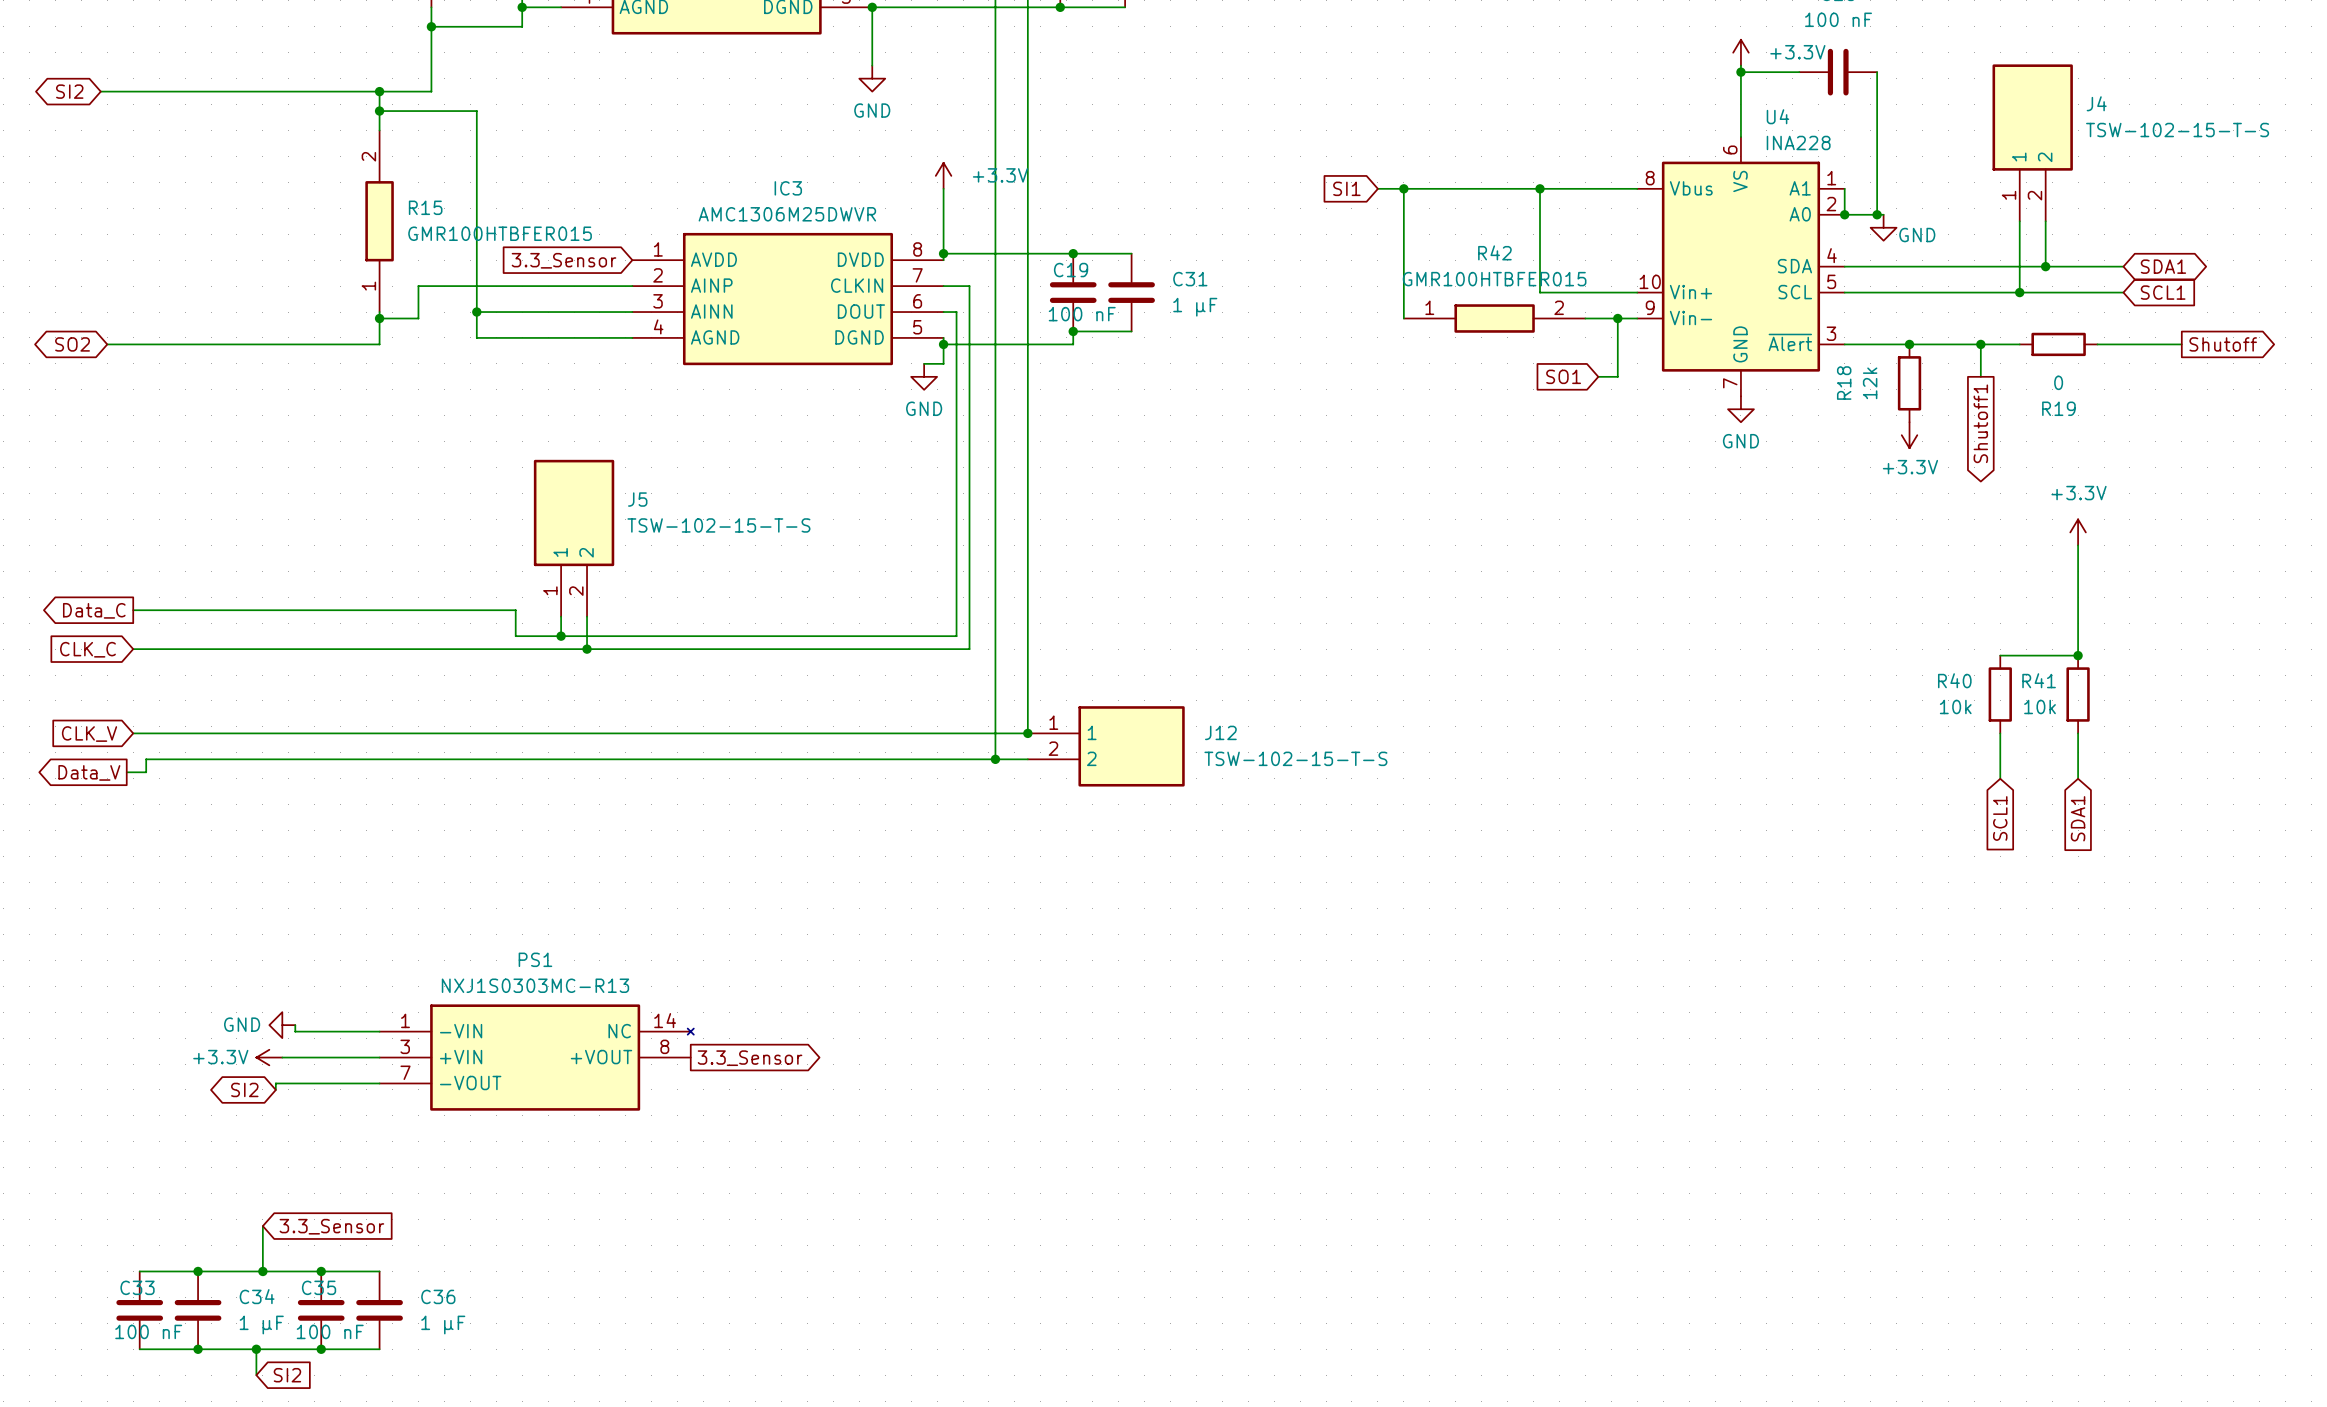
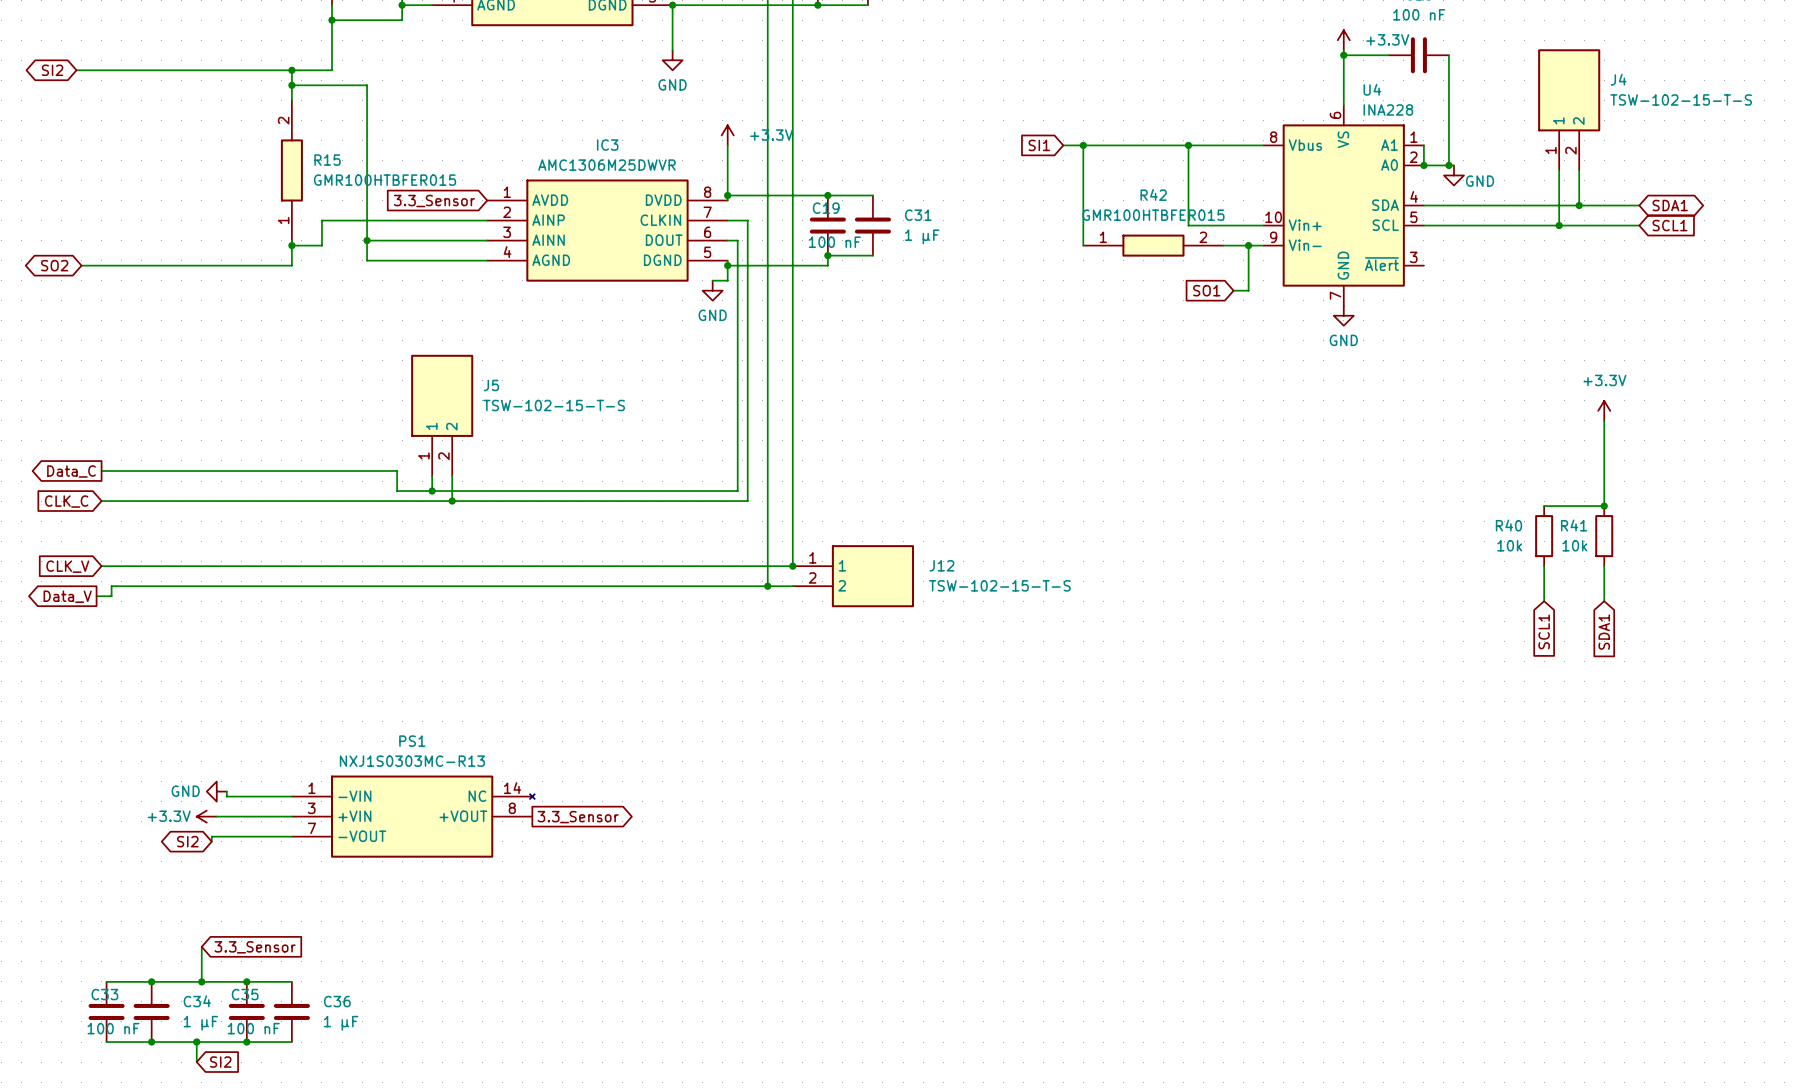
wire: (1844, 344) (2019, 344) -> none
junction: (1909, 344) -> none
wire: (1980, 344) (1980, 376) -> none
junction: (1980, 344) -> none
R19: 0 (2058, 344) -> none
wire: (2097, 344) (2181, 344) -> none
global label: Shutoff (2223, 344) -> none
R18: 12k (1909, 383) -> none
global label: Shutoff1 (1980, 423) -> none
power symbol: +3.3V (1909, 435) -> none

